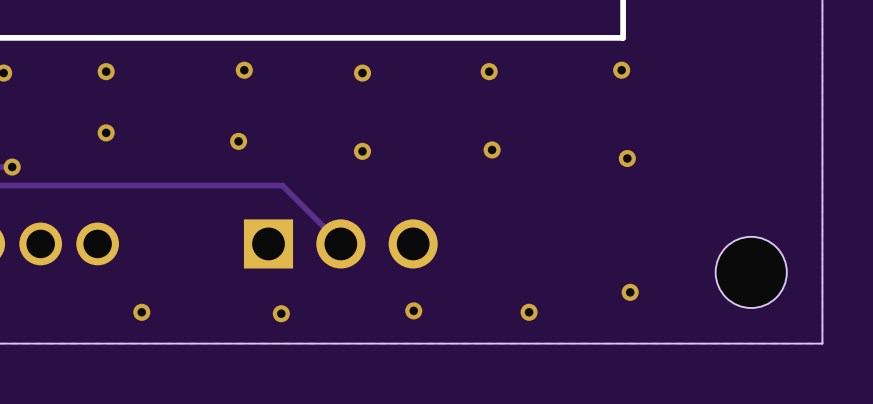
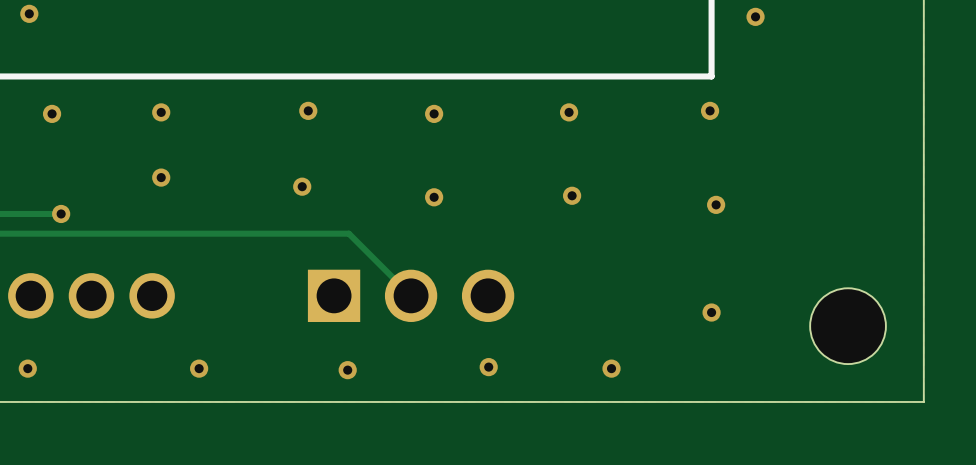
via position: (630, 292) -> (711, 312)

